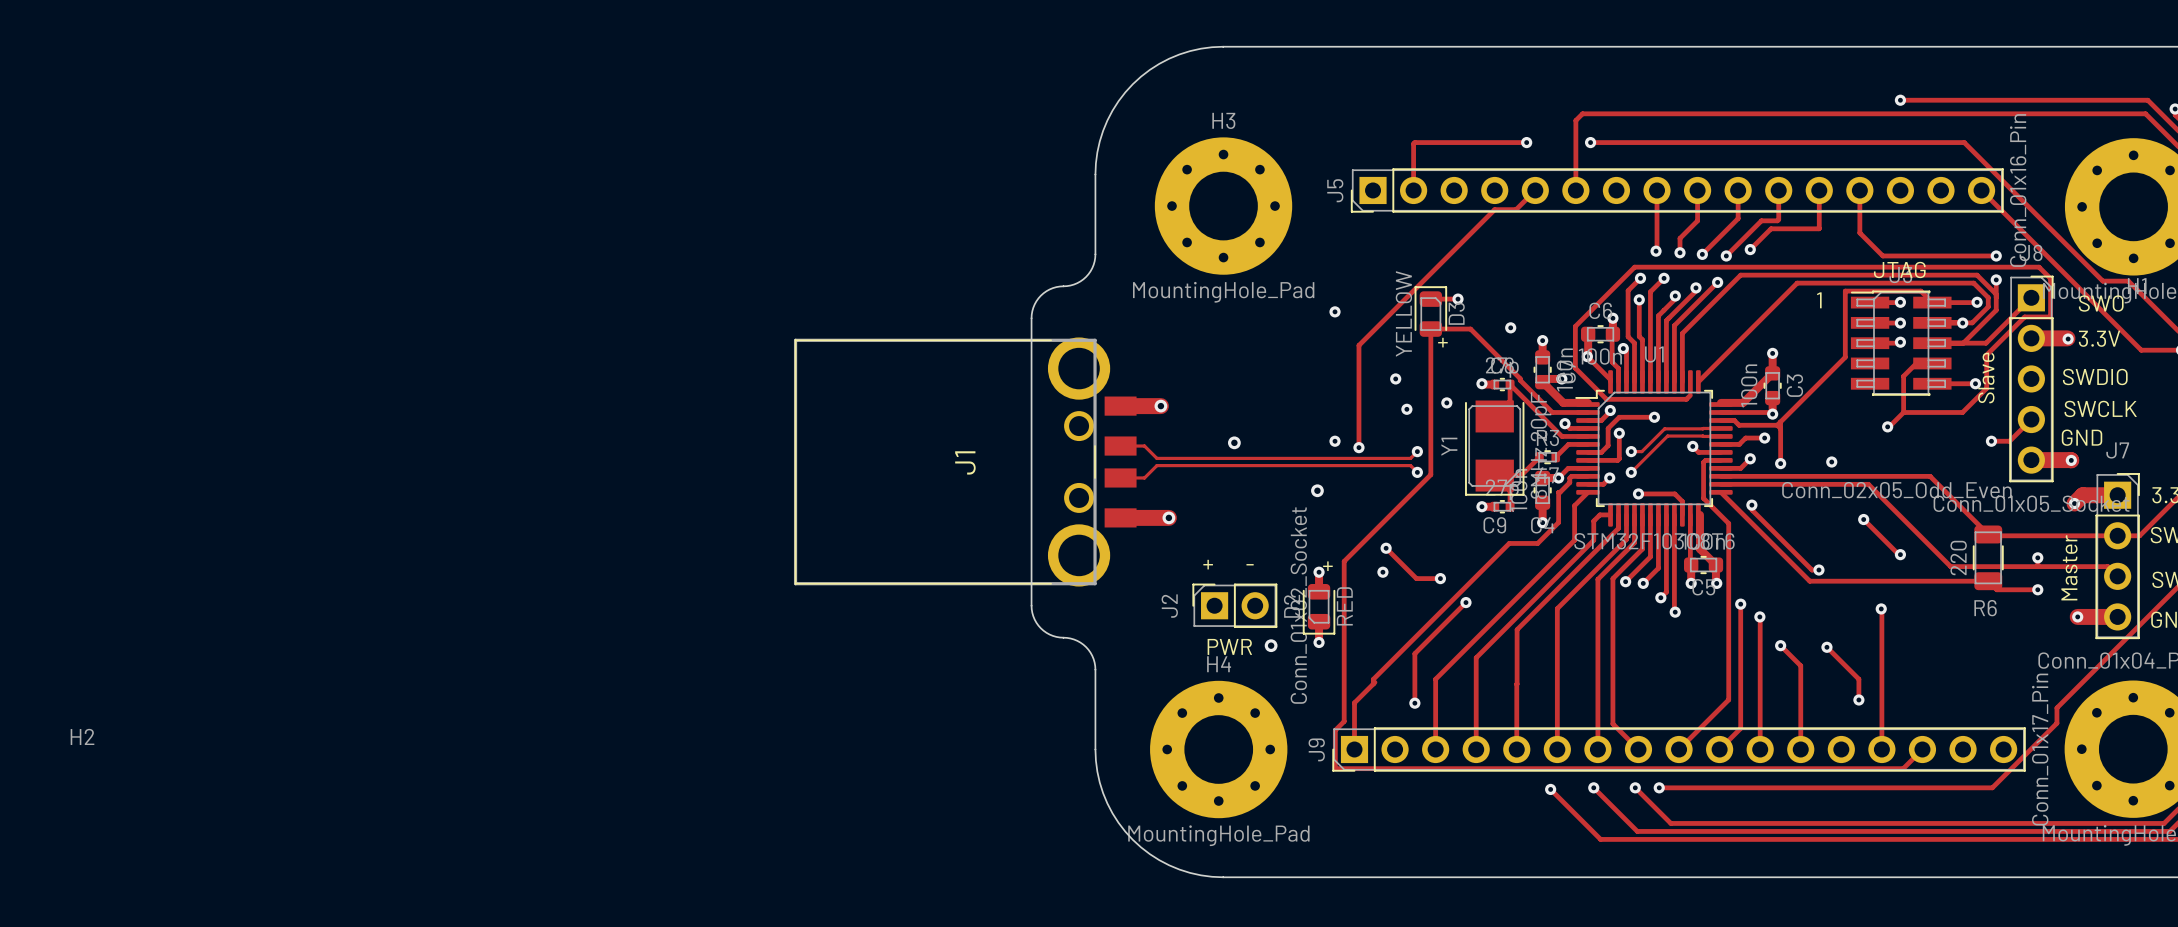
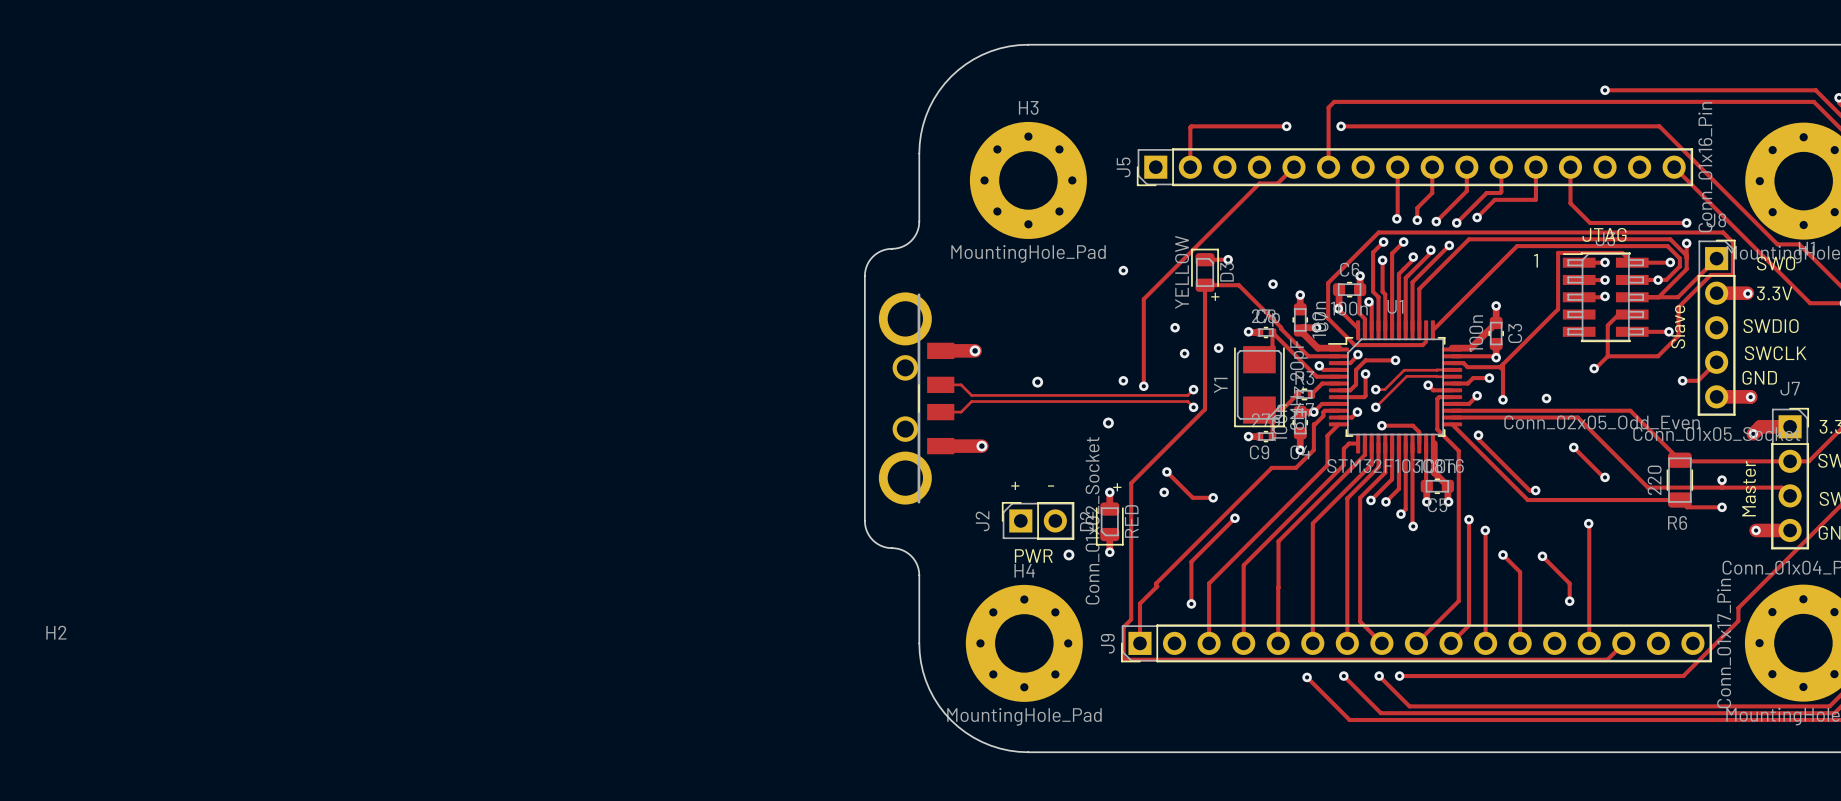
J1: (965, 462) -> none
part: none -> (916, 398)

